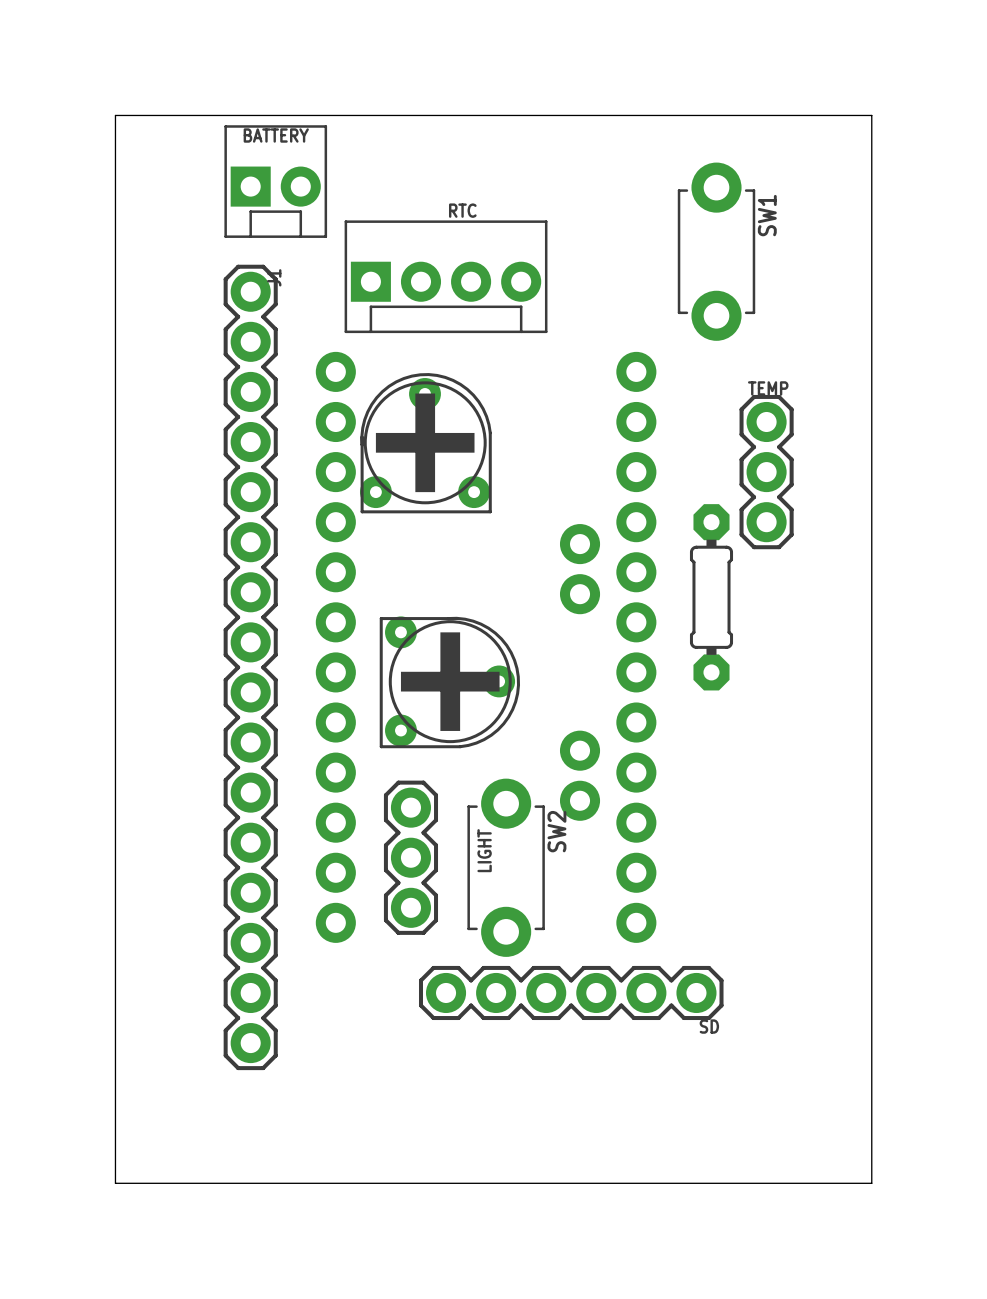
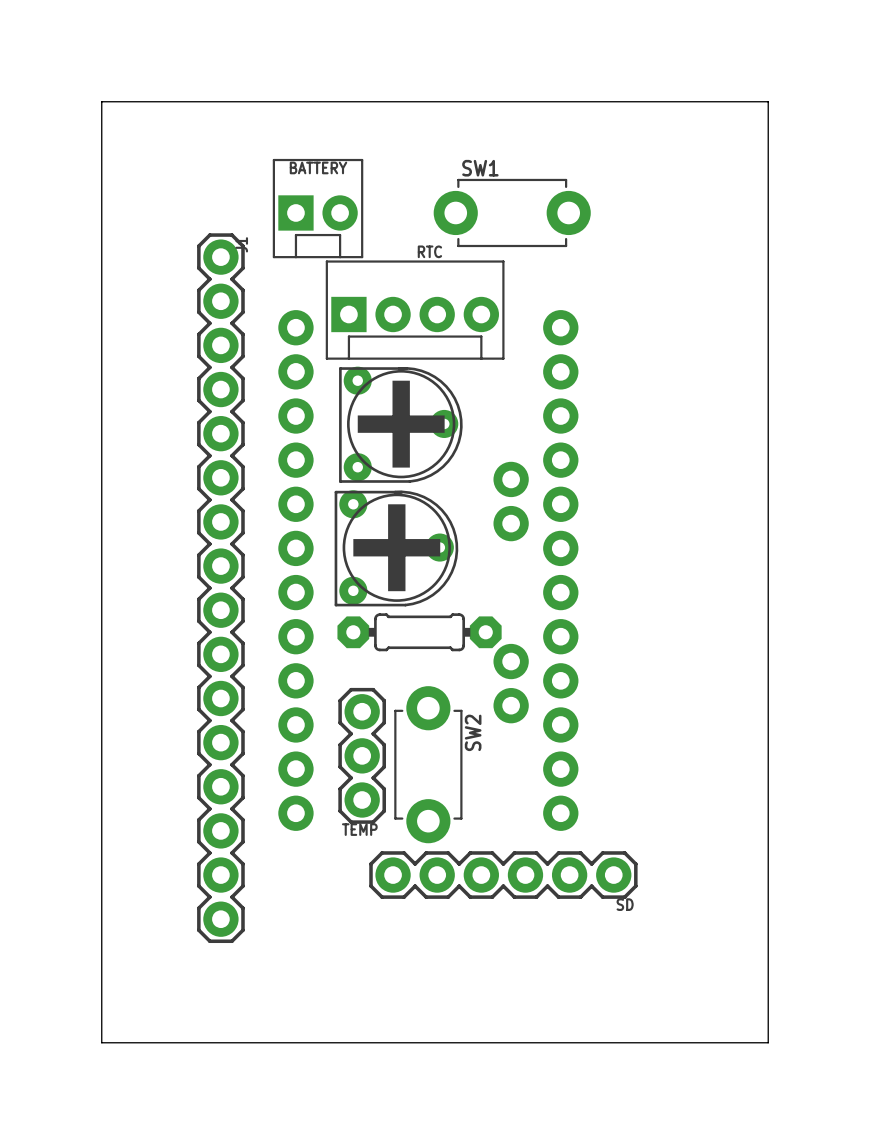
BATTERY position: (275, 181) -> (318, 208)
SW1 name position: SW1 (767, 215) -> SW1 (480, 168)
SW1 rotation: 0° (716, 251) -> 90° clockwise (512, 212)
SW1 position: (716, 251) -> (512, 212)
RTC position: (446, 276) -> (415, 310)
part rotation: 0° (425, 443) -> 90° clockwise (400, 424)
TEMP: (766, 472) -> none
part rotation: 0° (711, 597) -> 90° clockwise (419, 632)
part position: (711, 597) -> (419, 632)
part position: (449, 682) -> (396, 548)
LIGHT name: LIGHT (484, 850) -> TEMP (359, 829)
SW2 position: (506, 867) -> (428, 764)

